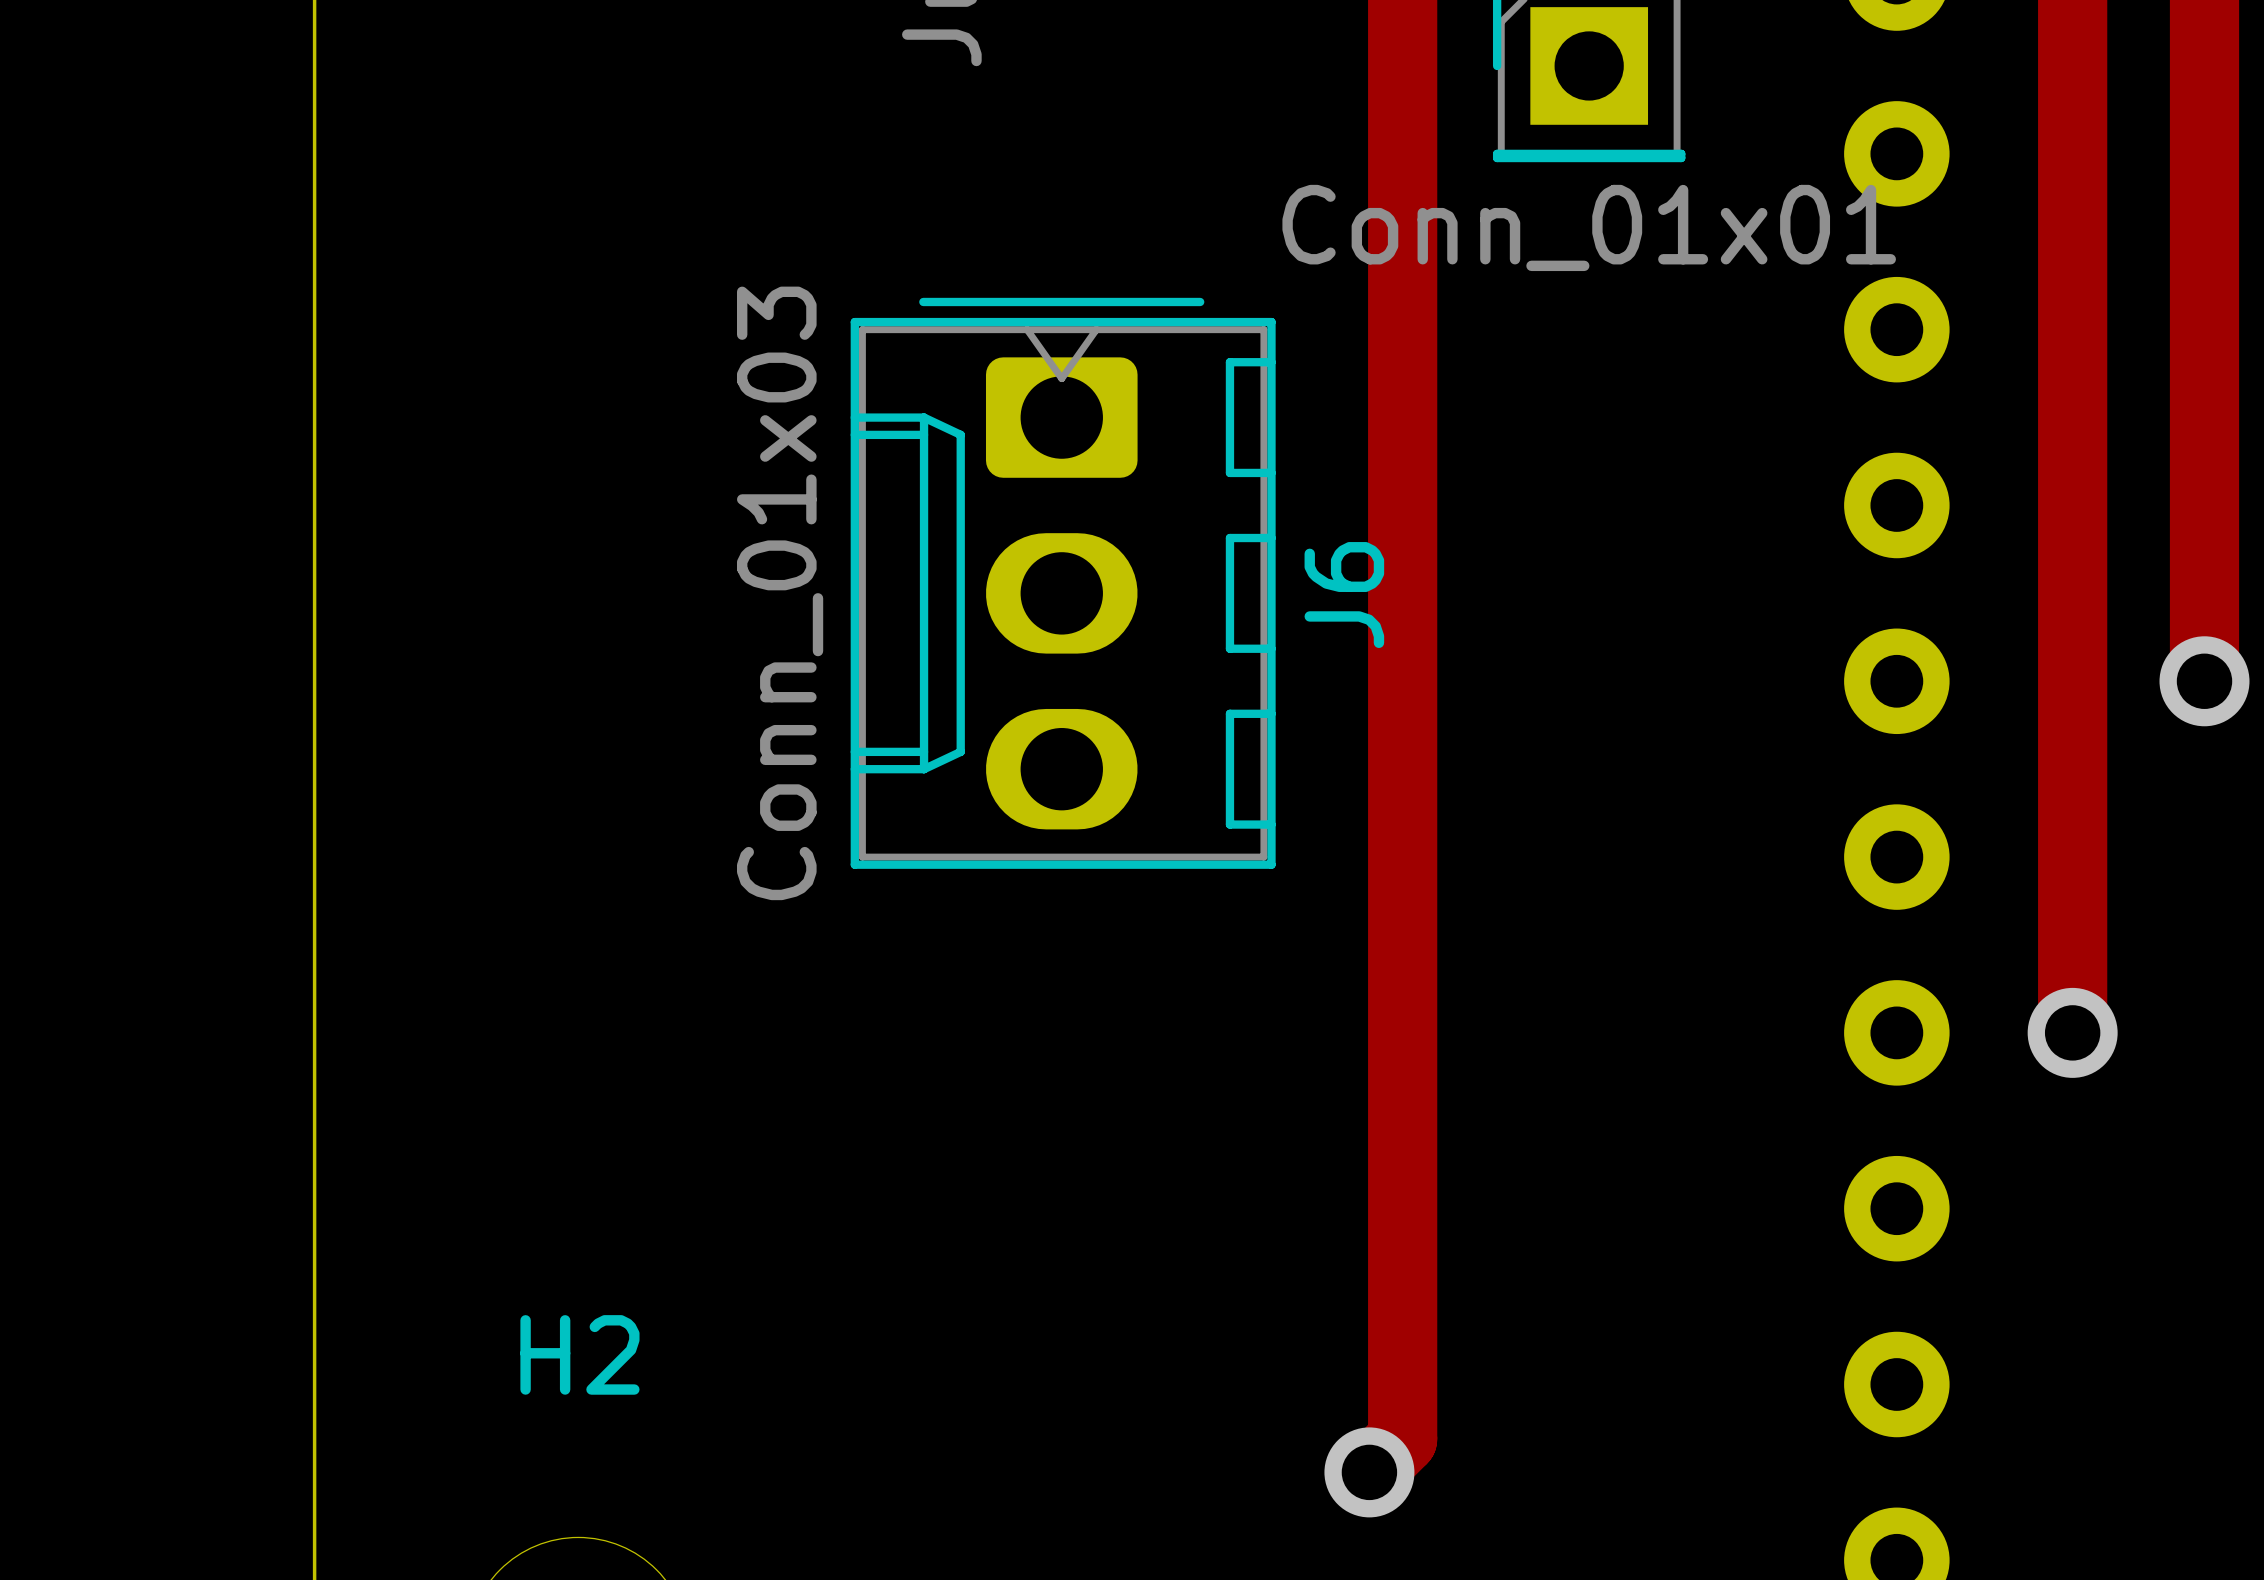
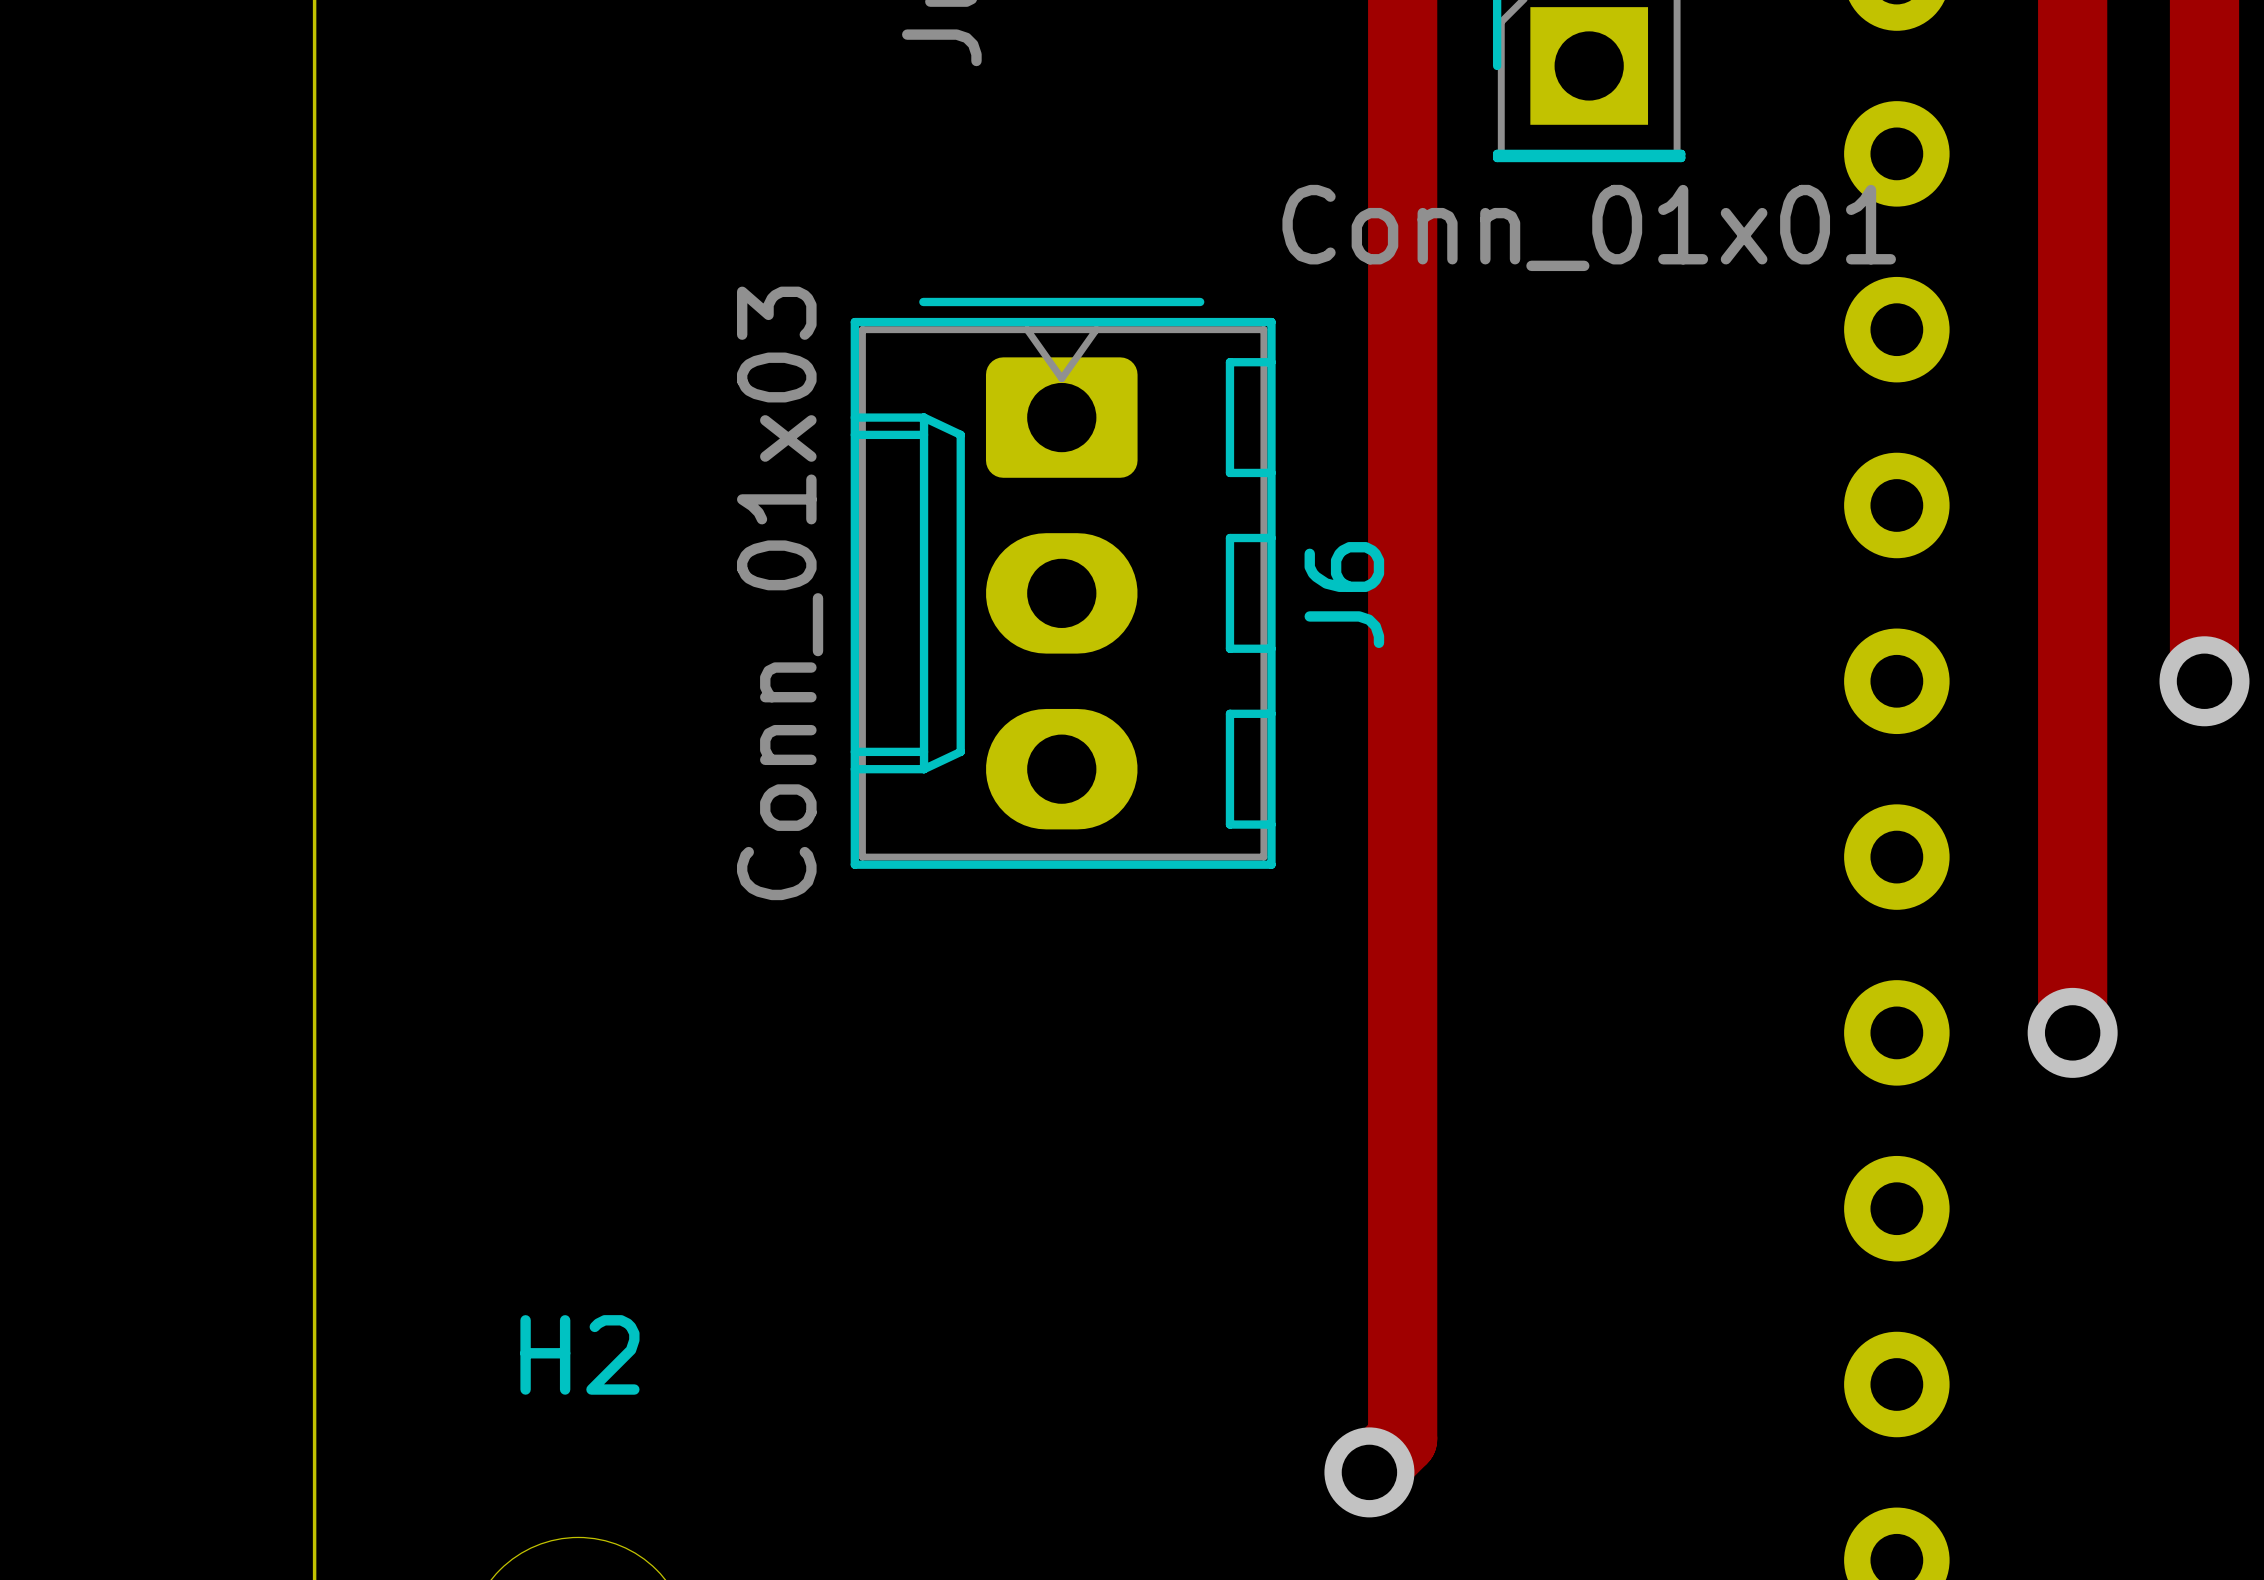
J6 footprint: [850, 297, 1276, 869] -> [850, 297, 1276, 869]

